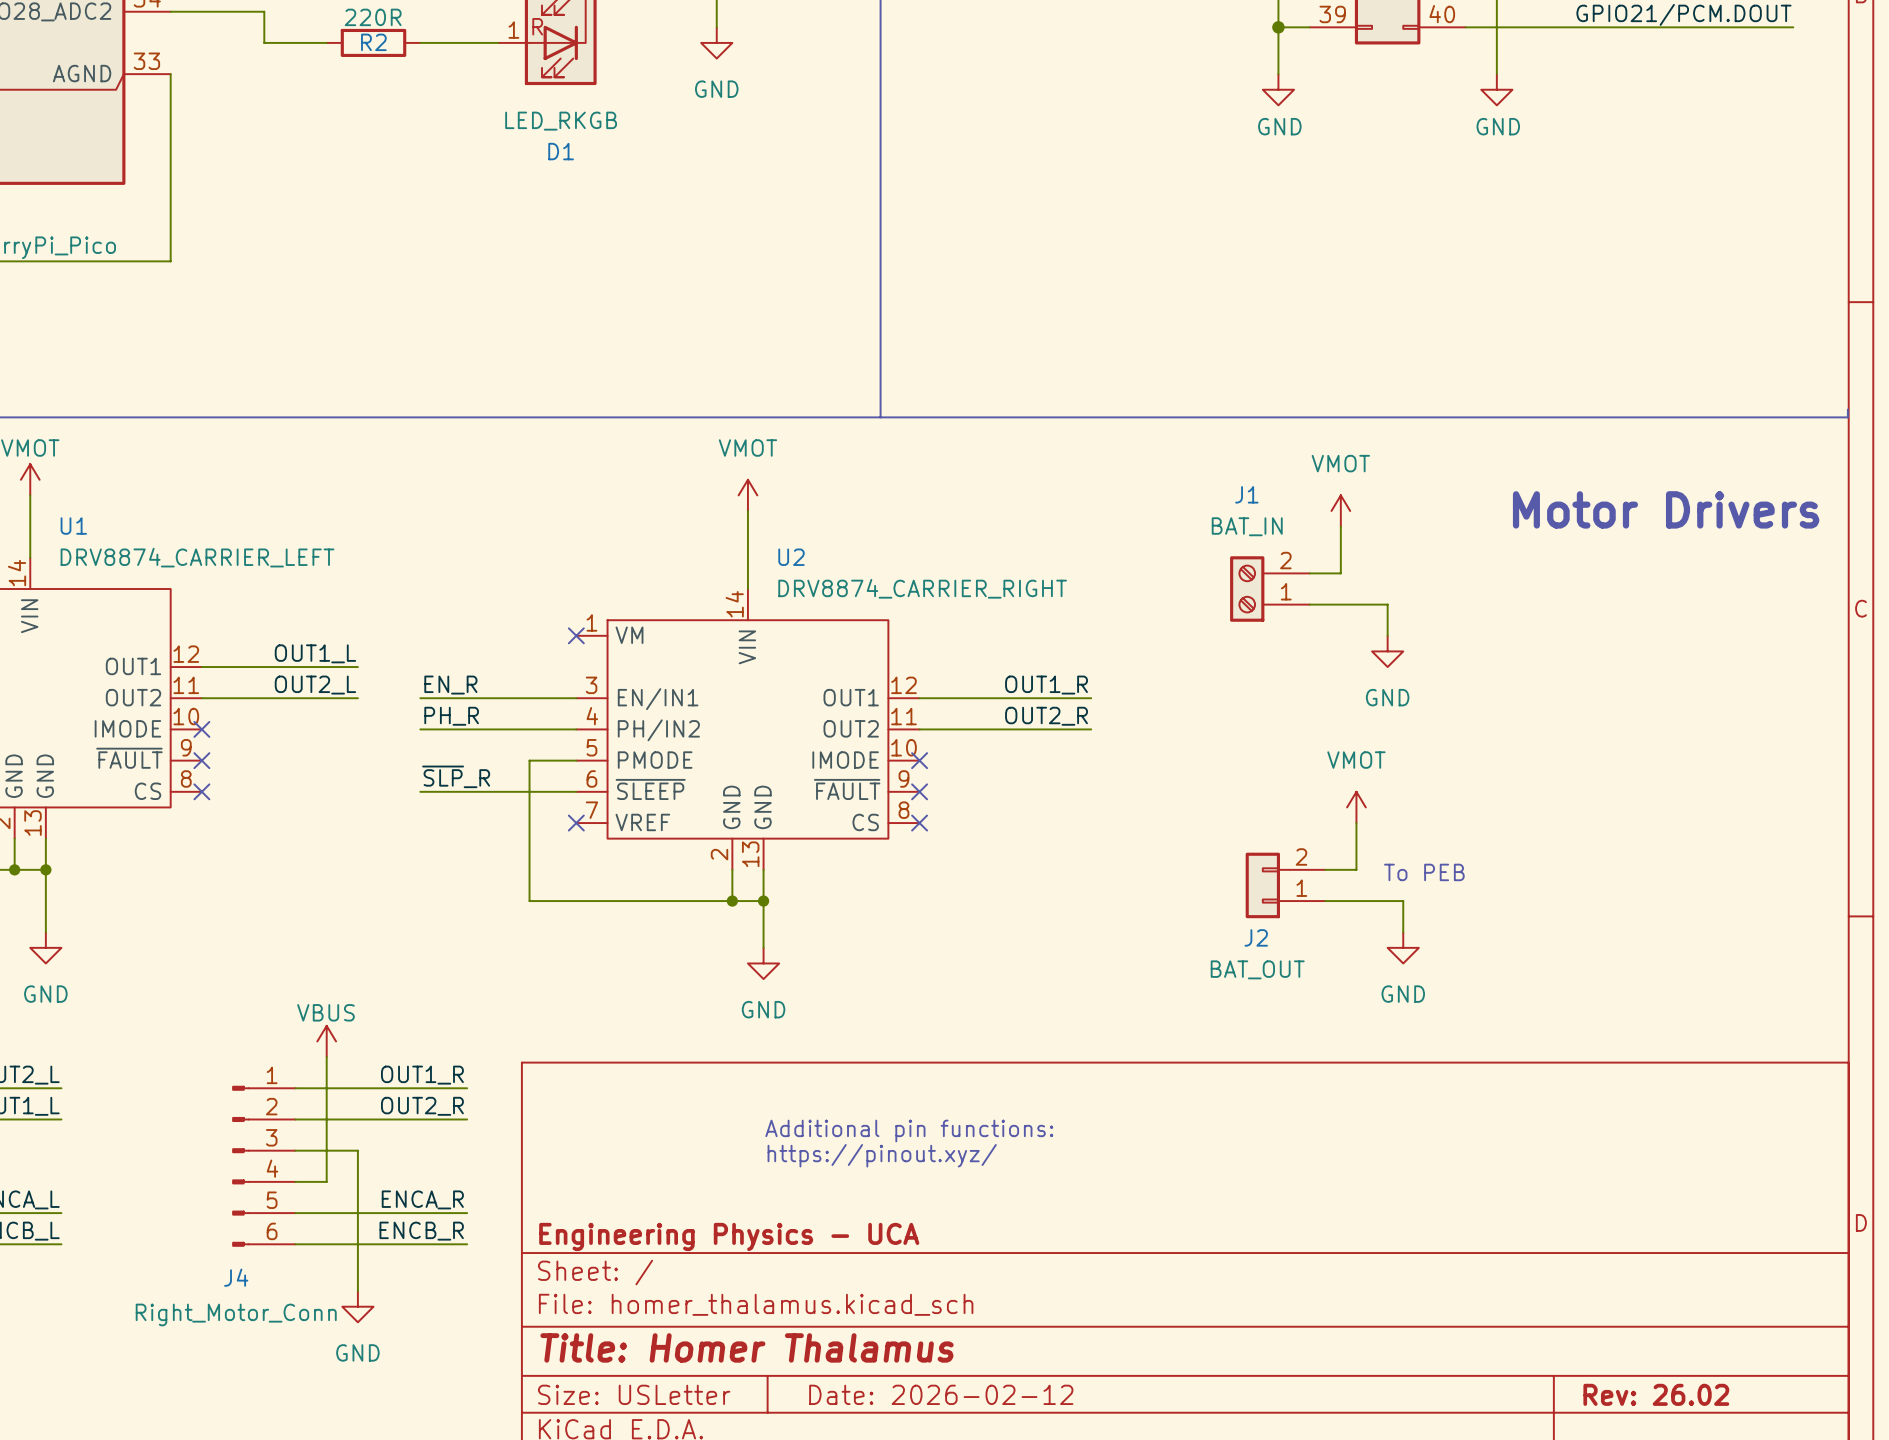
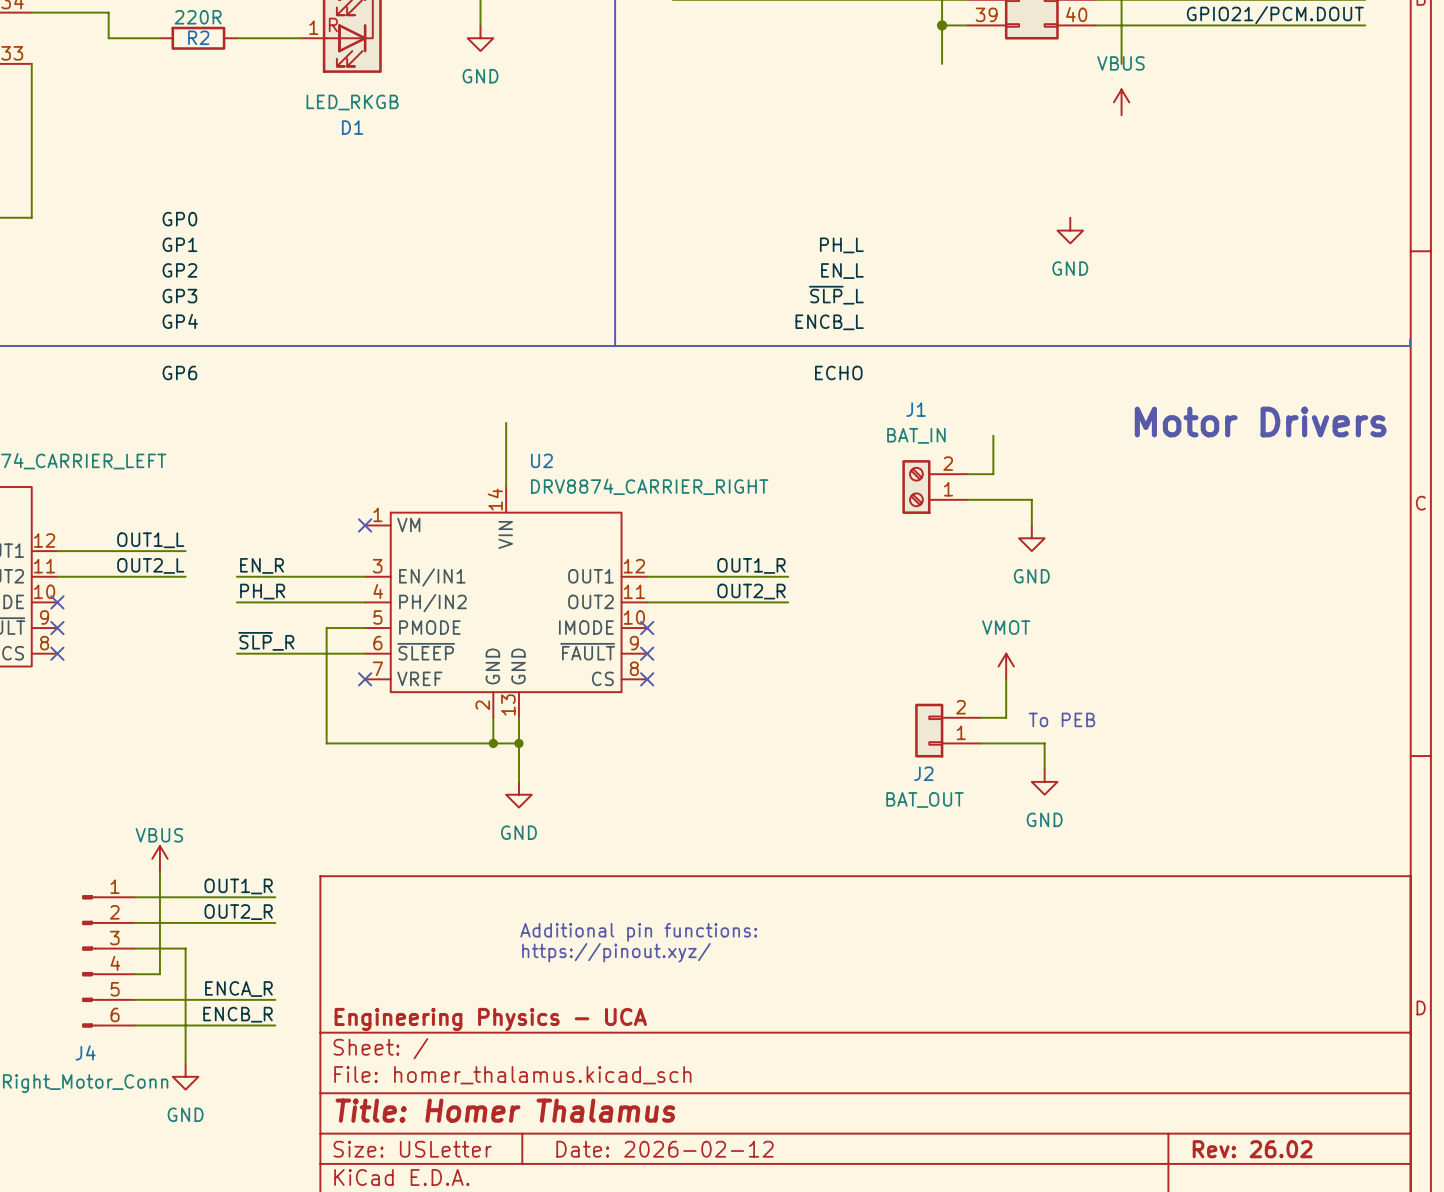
power symbol: GND (1278, 89) -> none
power symbol: GND (1496, 89) -> none
power symbol: none -> VBUS (1121, 102)
label: none -> GP0 (179, 219)
power symbol: none -> GND (1070, 230)
label: none -> GP1 (179, 244)
label: none -> PH_L (841, 245)
label: none -> GP2 (179, 270)
label: none -> EN_L (842, 271)
label: none -> ~{SLP}_L (836, 295)
label: none -> GP3 (179, 296)
label: none -> GP4 (180, 321)
label: none -> ENCB_L (829, 322)
label: none -> GP6 (179, 372)
label: none -> ECHO (838, 372)
power symbol: VMOT (747, 495) -> none
power symbol: VMOT (1340, 511) -> none

